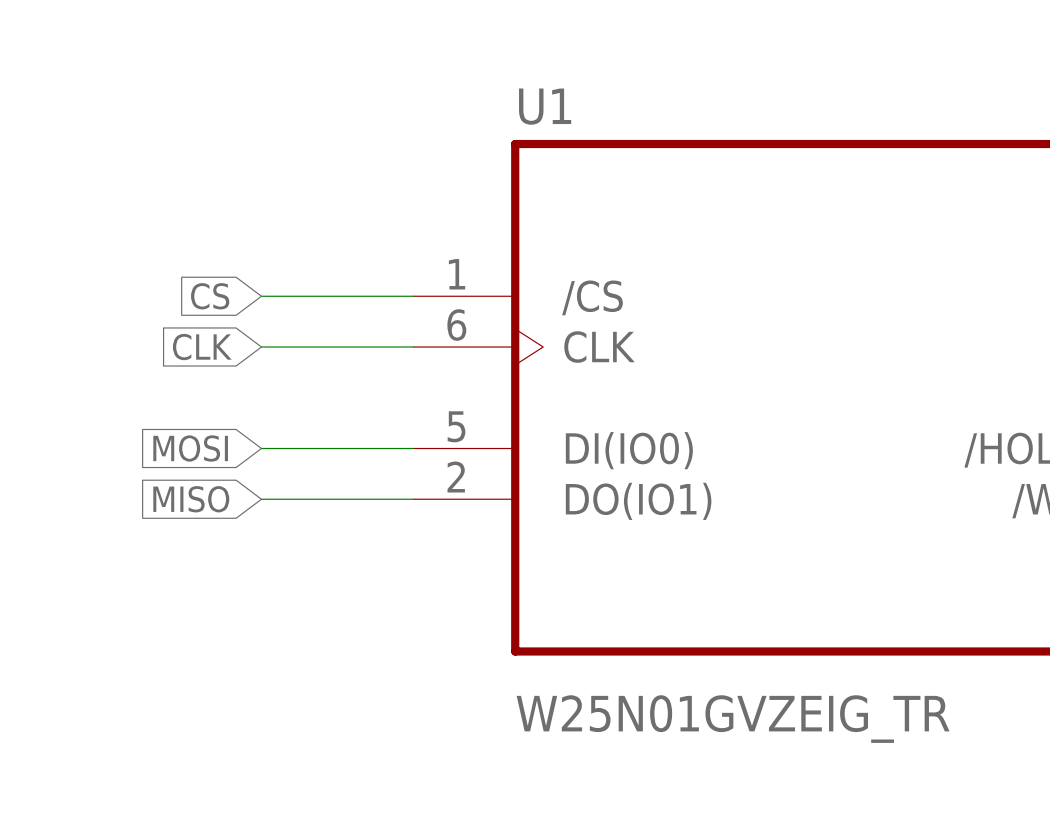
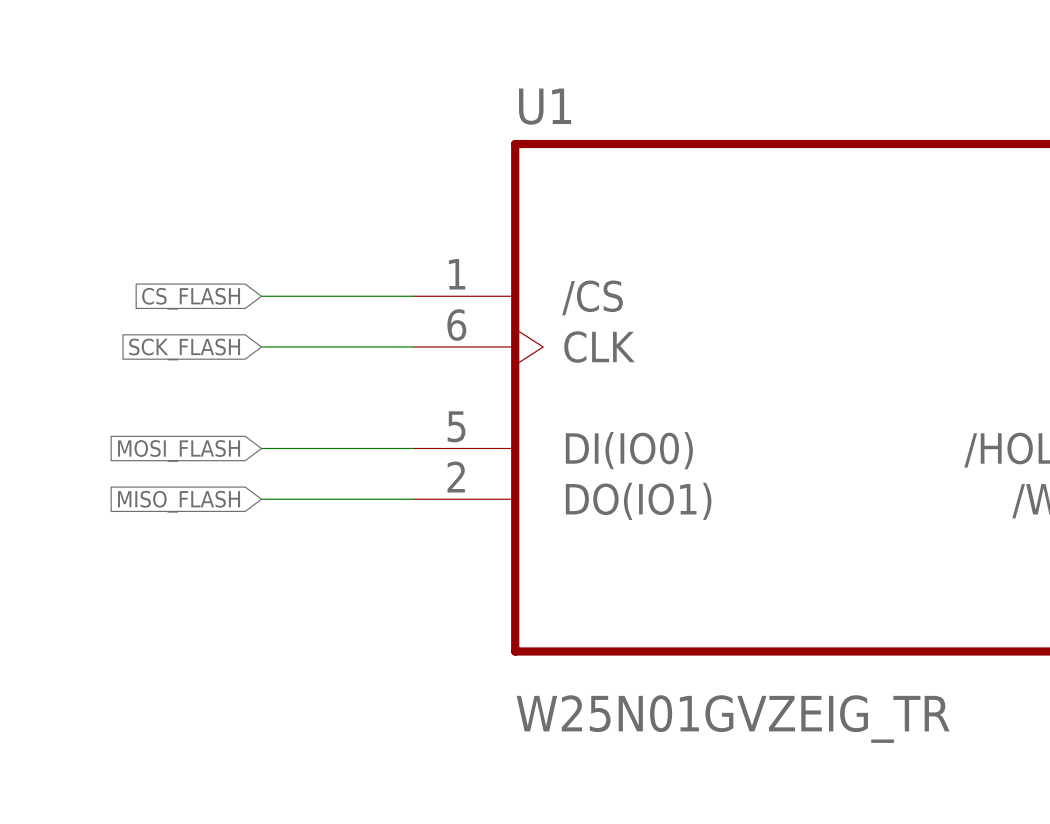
global label: CS (210, 296) -> CS_FLASH (191, 298)
global label: CLK (202, 347) -> SCK_FLASH (184, 349)
global label: MOSI (190, 448) -> MOSI_FLASH (179, 450)
global label: MISO (191, 499) -> MISO_FLASH (179, 501)

